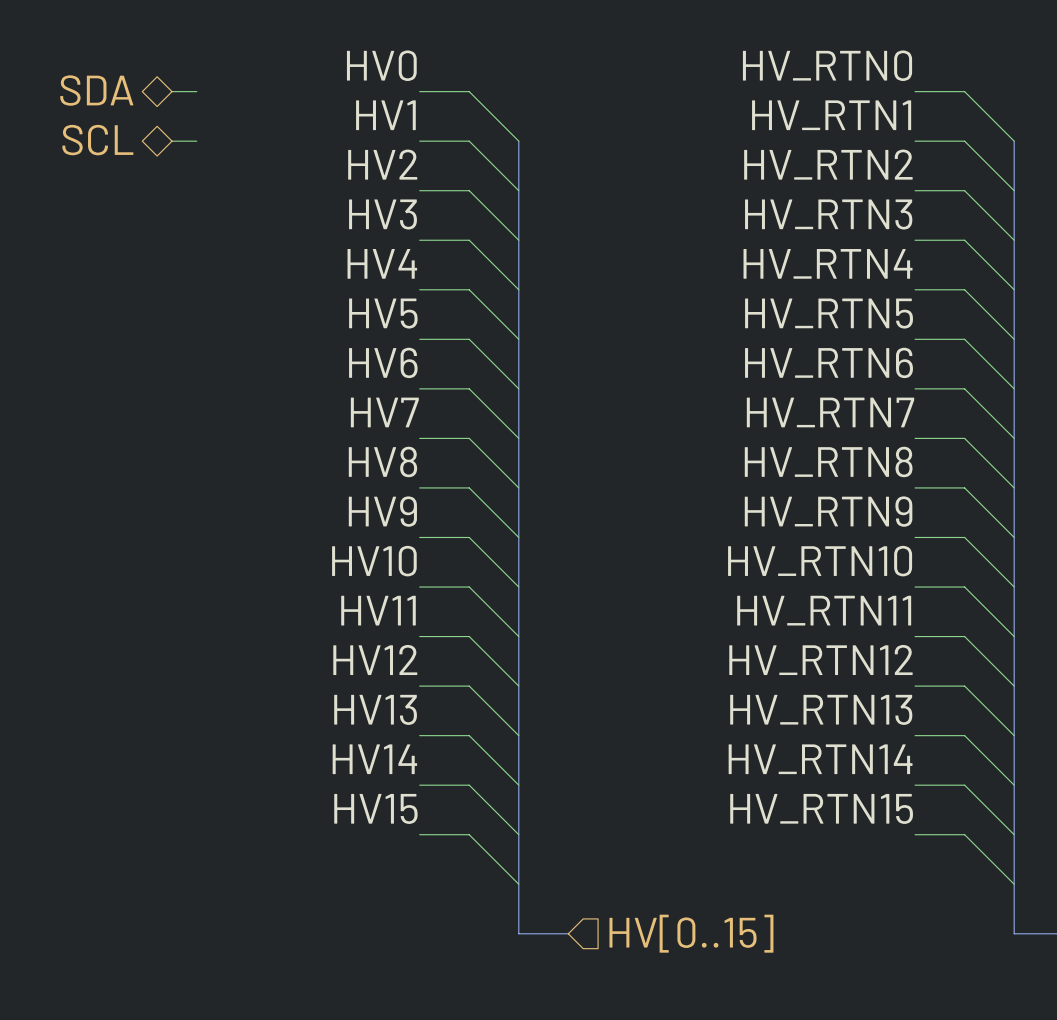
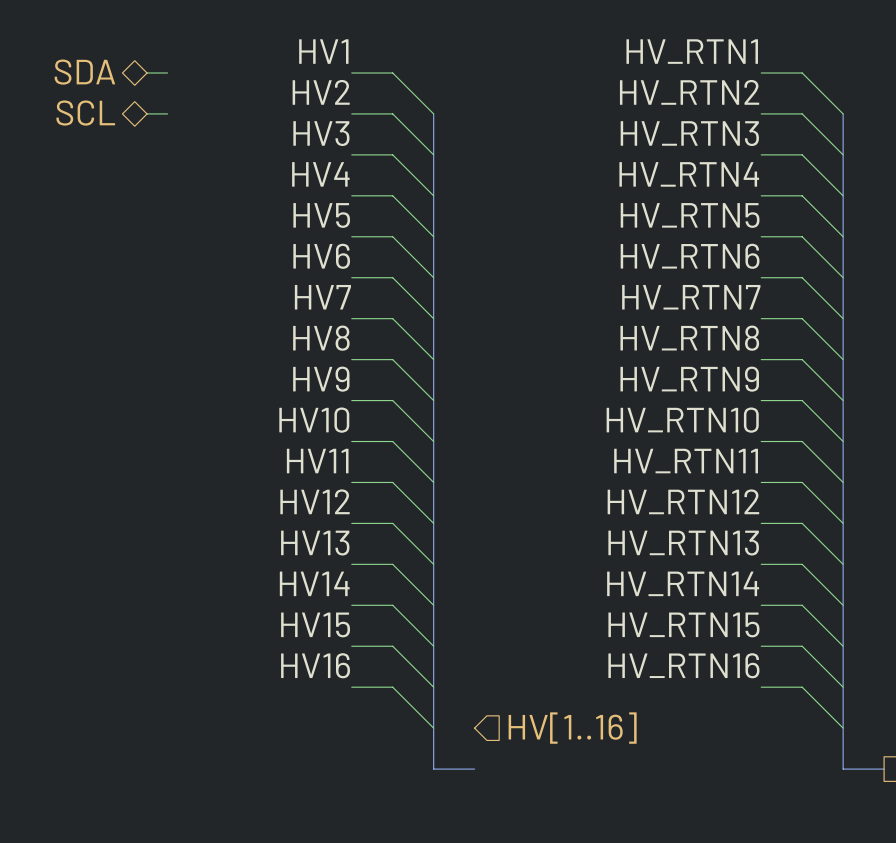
label: HV0 (381, 65) -> HV1 (323, 51)
label: HV_RTN0 (827, 65) -> HV_RTN1 (692, 51)
label: HV1 (385, 115) -> HV2 (321, 92)
label: HV_RTN1 (831, 115) -> HV_RTN2 (689, 92)
label: HV2 (382, 164) -> HV3 (321, 133)
label: HV_RTN2 (828, 164) -> HV_RTN3 (689, 133)
label: HV3 (383, 214) -> HV4 (320, 174)
label: HV_RTN3 (828, 214) -> HV_RTN4 (689, 174)
label: HV4 (382, 263) -> HV5 (321, 215)
label: HV_RTN4 (828, 263) -> HV_RTN5 (690, 215)
label: HV5 (383, 313) -> HV6 (321, 256)
label: HV_RTN5 (829, 313) -> HV_RTN6 (690, 256)
label: HV6 (383, 362) -> HV7 (322, 297)
label: HV_RTN6 (829, 362) -> HV_RTN7 (691, 297)
label: HV7 (384, 412) -> HV8 (321, 338)
label: HV_RTN7 (830, 412) -> HV_RTN8 (689, 338)
label: HV8 (382, 461) -> HV9 (321, 379)
label: HV_RTN8 (828, 461) -> HV_RTN9 (689, 379)
label: HV9 (382, 511) -> HV10 (314, 420)
label: HV_RTN9 (828, 511) -> HV_RTN10 (682, 420)
label: HV10 (374, 561) -> HV11 (317, 461)
label: HV_RTN10 (820, 561) -> HV_RTN11 (686, 461)
label: HV11 (378, 610) -> HV12 (315, 501)
label: HV_RTN11 (824, 610) -> HV_RTN12 (683, 501)
label: HV12 (375, 660) -> HV13 (315, 543)
label: HV_RTN12 (820, 660) -> HV_RTN13 (683, 543)
label: HV13 (375, 709) -> HV14 (314, 583)
label: HV_RTN13 (821, 709) -> HV_RTN14 (683, 583)
label: HV14 (374, 759) -> HV15 (315, 624)
label: HV_RTN14 (820, 759) -> HV_RTN15 (683, 624)
label: HV15 (375, 808) -> HV16 (315, 665)
label: HV_RTN15 (821, 808) -> HV_RTN16 (683, 665)
hierarchical label: HV[0..15] (691, 933) -> HV[1..16] (572, 728)

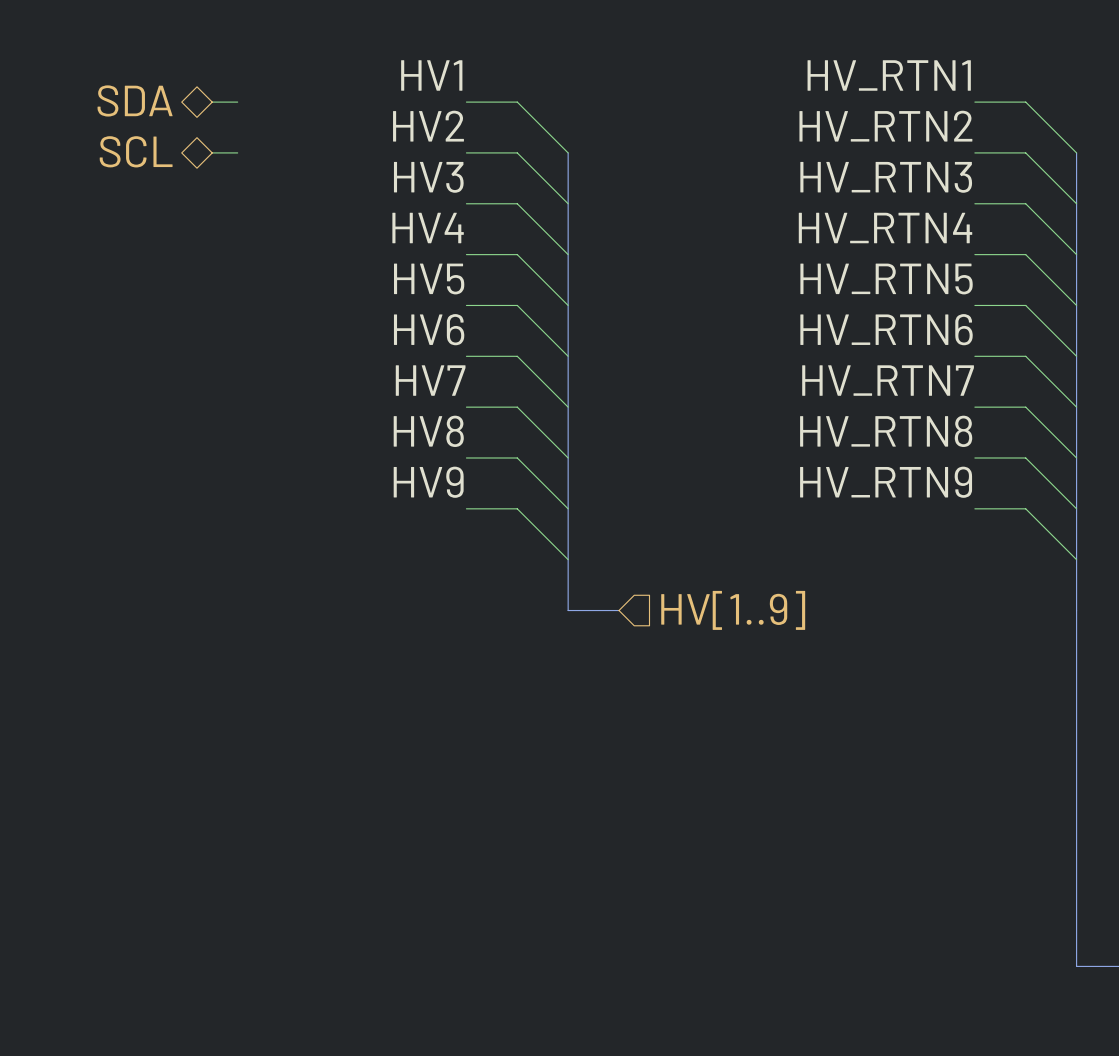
label: HV10 (314, 420) -> none
label: HV_RTN10 (682, 420) -> none
wire: (351, 441) (392, 441) (433, 482) -> none
wire: (761, 441) (802, 441) (843, 482) -> none
label: HV11 (317, 461) -> none
label: HV_RTN11 (686, 461) -> none
wire: (351, 482) (392, 482) (433, 523) -> none
bus: (433, 482) (433, 769) (474, 769) -> (568, 610) (618, 610)
hierarchical label: none -> HV[1..9] (733, 610)
wire: (761, 482) (802, 482) (843, 523) -> none
label: HV12 (315, 501) -> none
label: HV_RTN12 (683, 501) -> none
wire: (351, 523) (392, 523) (433, 564) -> none
wire: (761, 523) (802, 523) (843, 564) -> none
label: HV13 (315, 543) -> none
label: HV_RTN13 (683, 543) -> none
wire: (351, 564) (392, 564) (433, 605) -> none
wire: (761, 564) (802, 564) (843, 605) -> none
label: HV14 (314, 583) -> none
label: HV_RTN14 (683, 583) -> none
wire: (351, 605) (392, 605) (433, 646) -> none
wire: (761, 605) (802, 605) (843, 646) -> none
label: HV15 (315, 624) -> none
label: HV_RTN15 (683, 624) -> none
wire: (351, 646) (392, 646) (433, 687) -> none
wire: (761, 646) (802, 646) (843, 687) -> none
label: HV16 (315, 665) -> none
label: HV_RTN16 (683, 665) -> none
wire: (351, 687) (392, 687) (433, 728) -> none
wire: (761, 687) (802, 687) (843, 728) -> none
hierarchical label: HV[1..16] (572, 728) -> none

